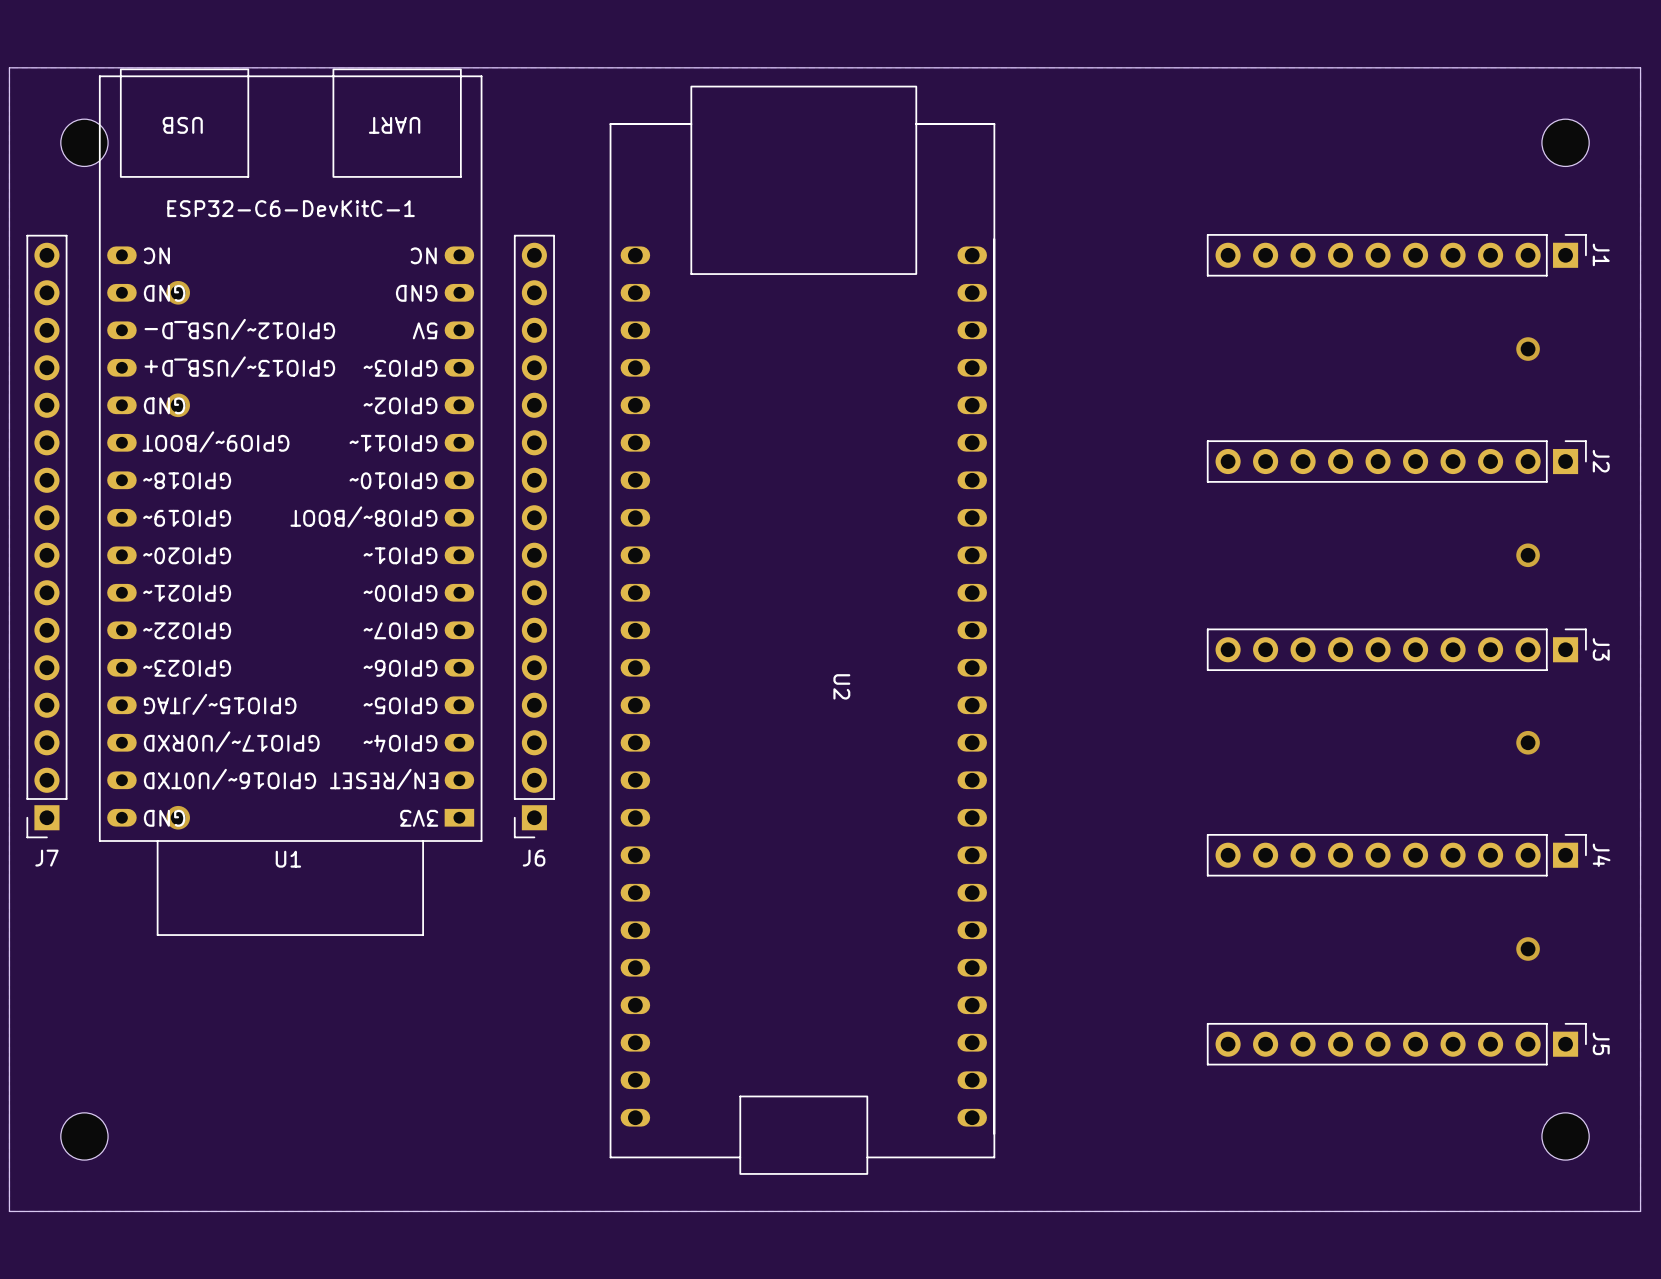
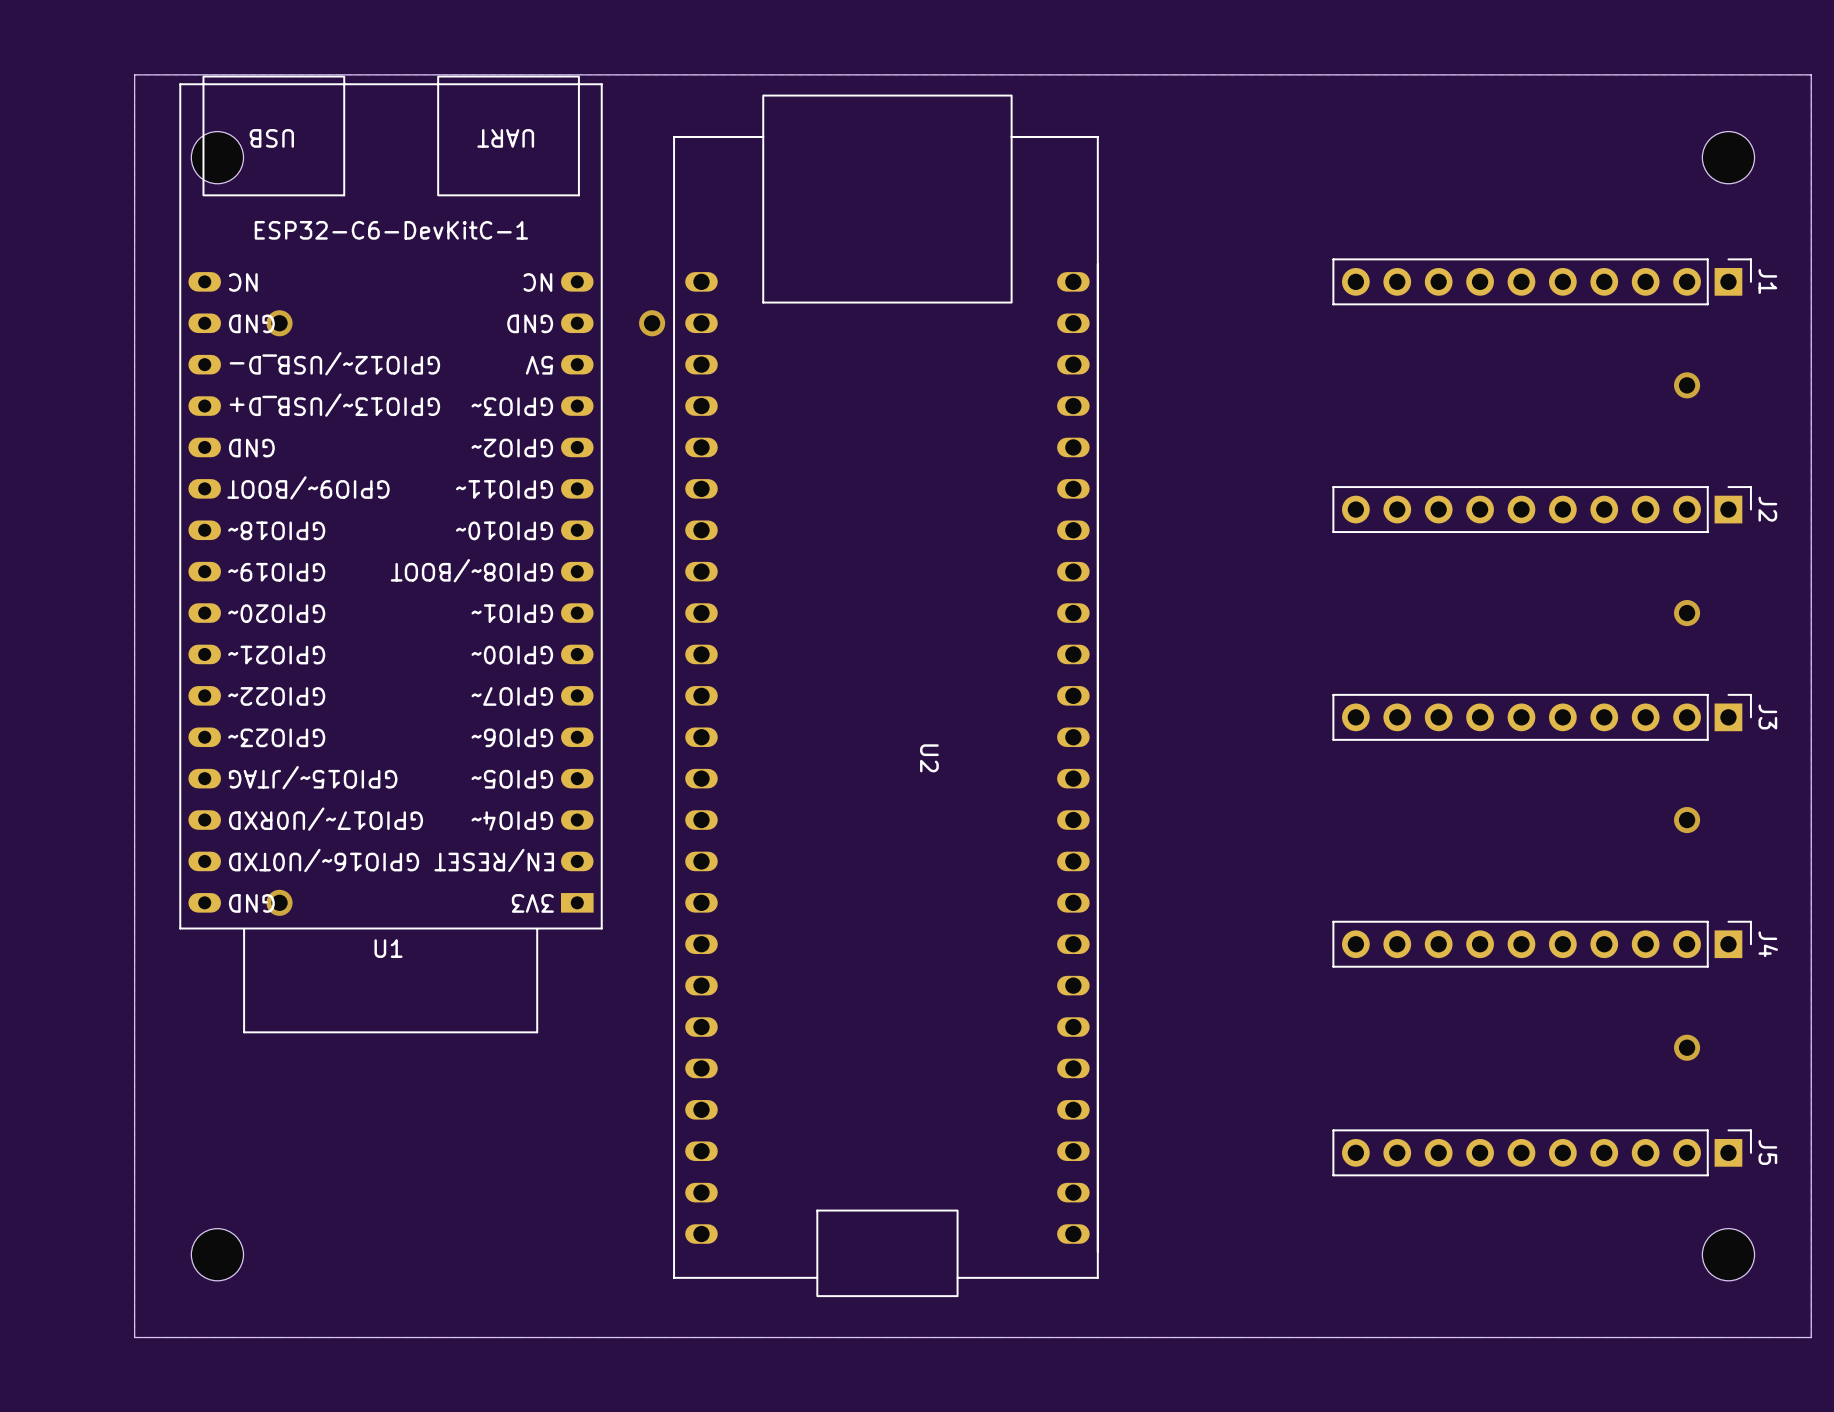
board edge: (121, 67) (9, 67) (9, 1211) (121, 1211) -> (134, 74) (134, 1337)
part position: (84, 142) -> (217, 157)
via: (178, 292) -> none
via: none -> (279, 323)
via: none -> (652, 323)
via: (178, 405) -> none
U1 position: (290, 502) -> (391, 554)
J7: (46, 536) -> none
J6: (534, 536) -> none
via position: (178, 817) -> (279, 902)
part position: (84, 1136) -> (217, 1254)

